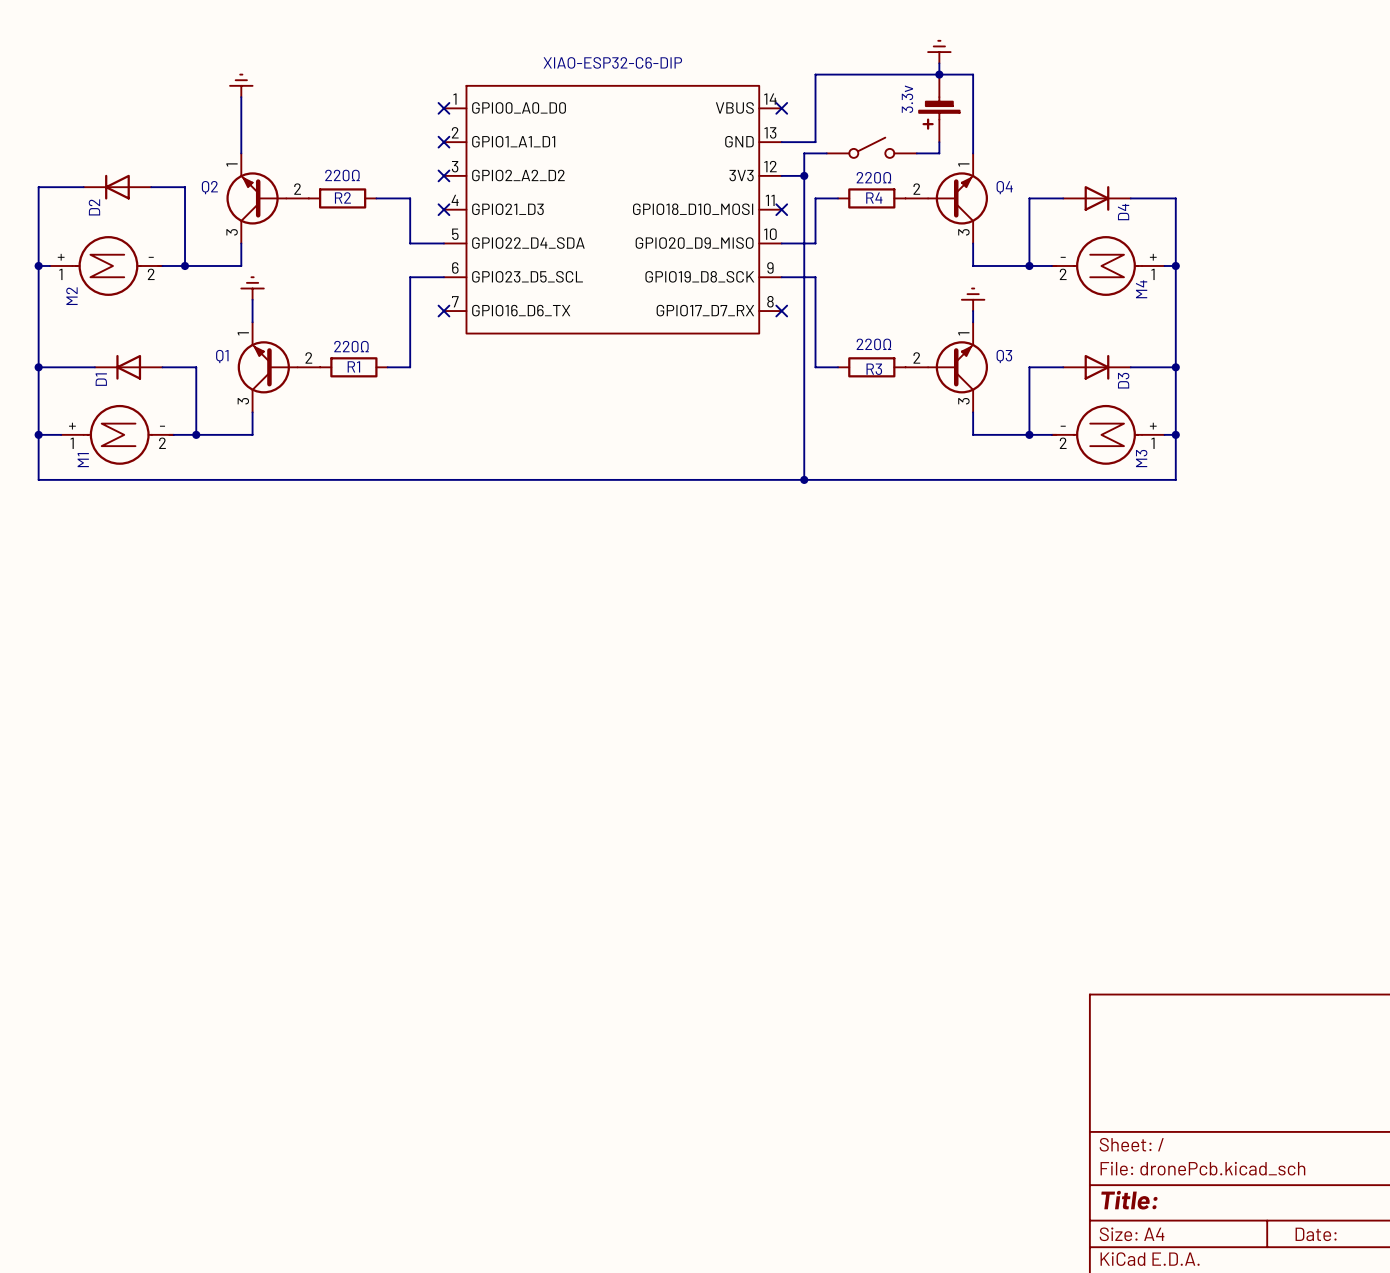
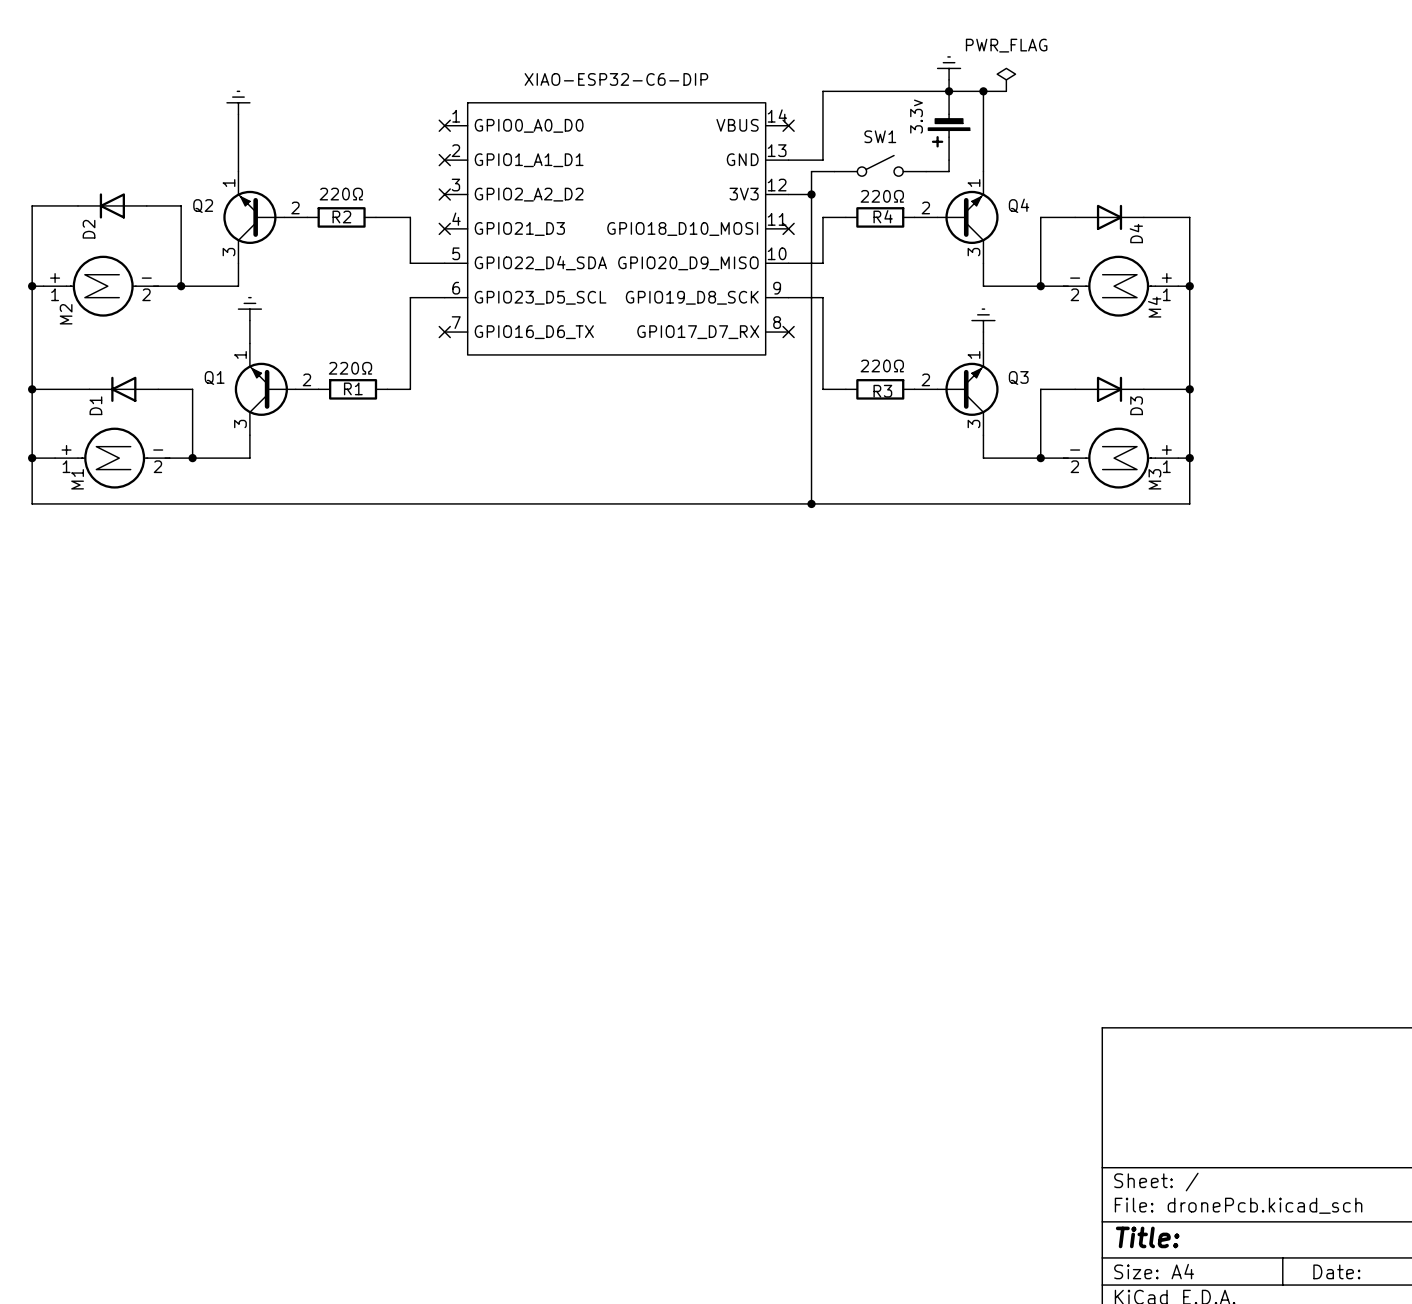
power symbol: none -> PWR_FLAG (1006, 79)
wire: none -> (983, 91) (1006, 91)
junction: none -> (983, 91)
SW1 name: none -> SW1 (880, 136)

